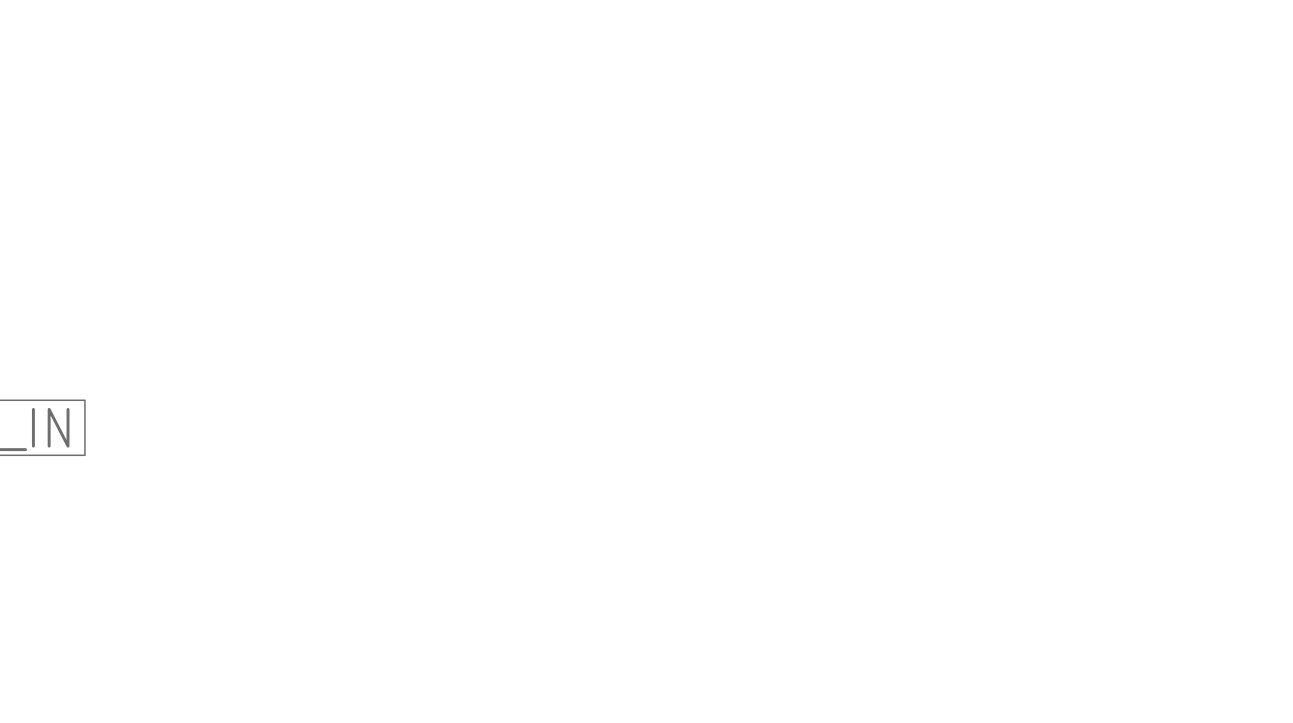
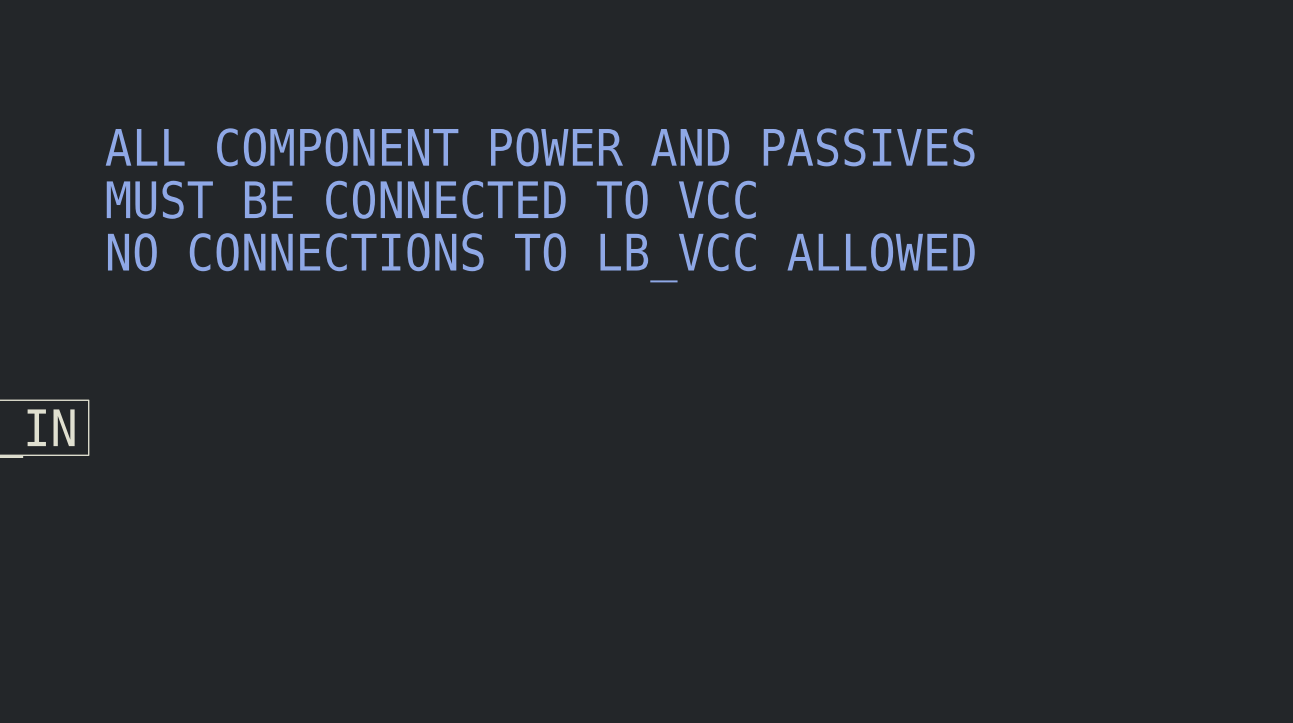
text: none -> ALL COMPONENT POWER AND PASSIVES (540, 147)
text: none -> MUST BE CONNECTED TO VCC (431, 199)
text: none -> NO CONNECTIONS TO LB_VCC ALLOWED (541, 257)

